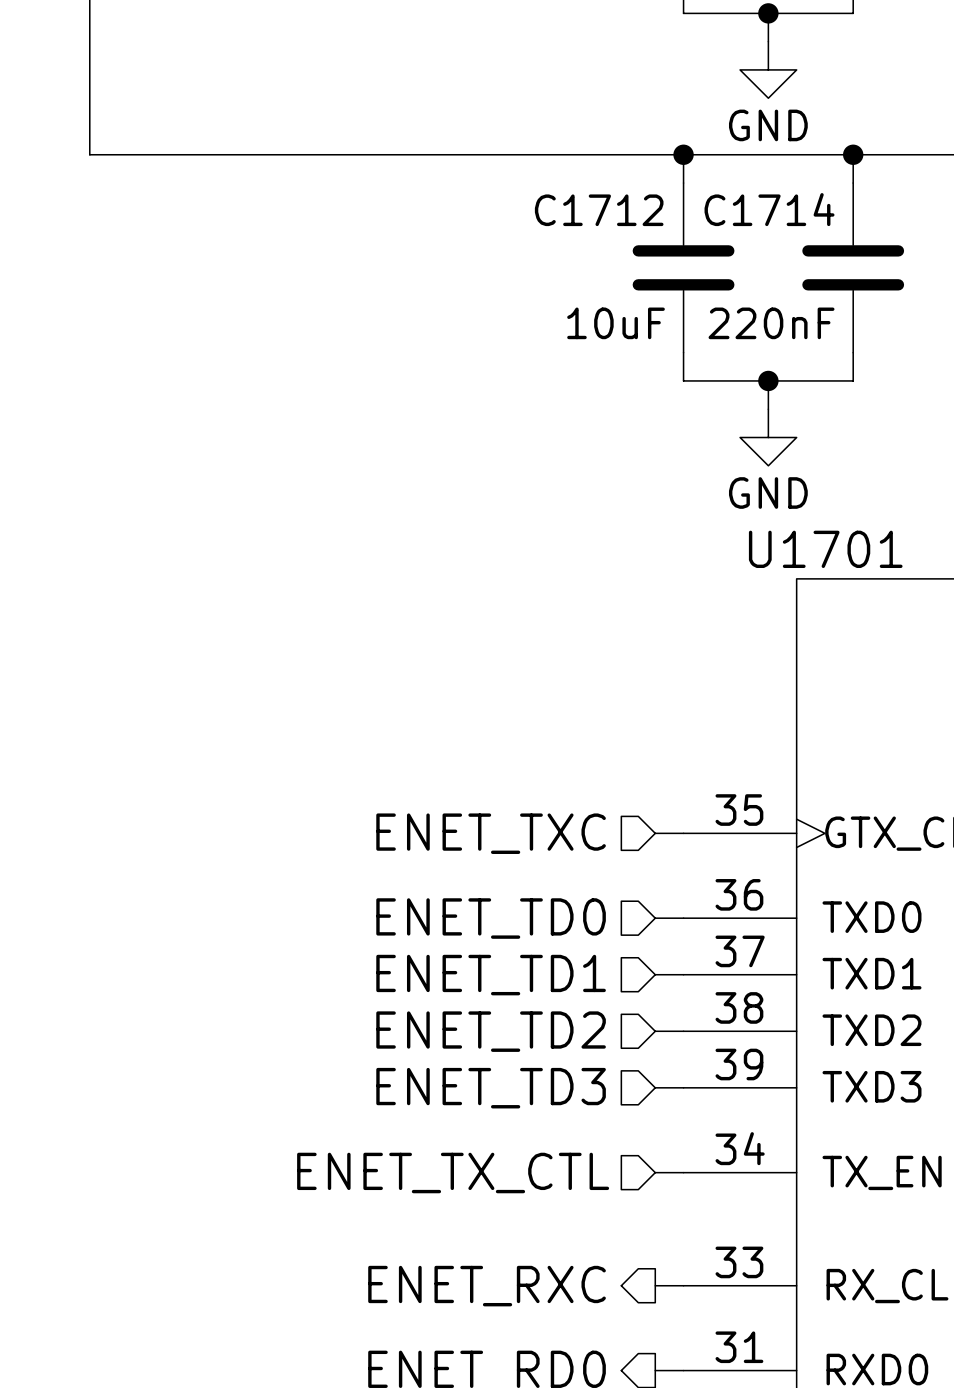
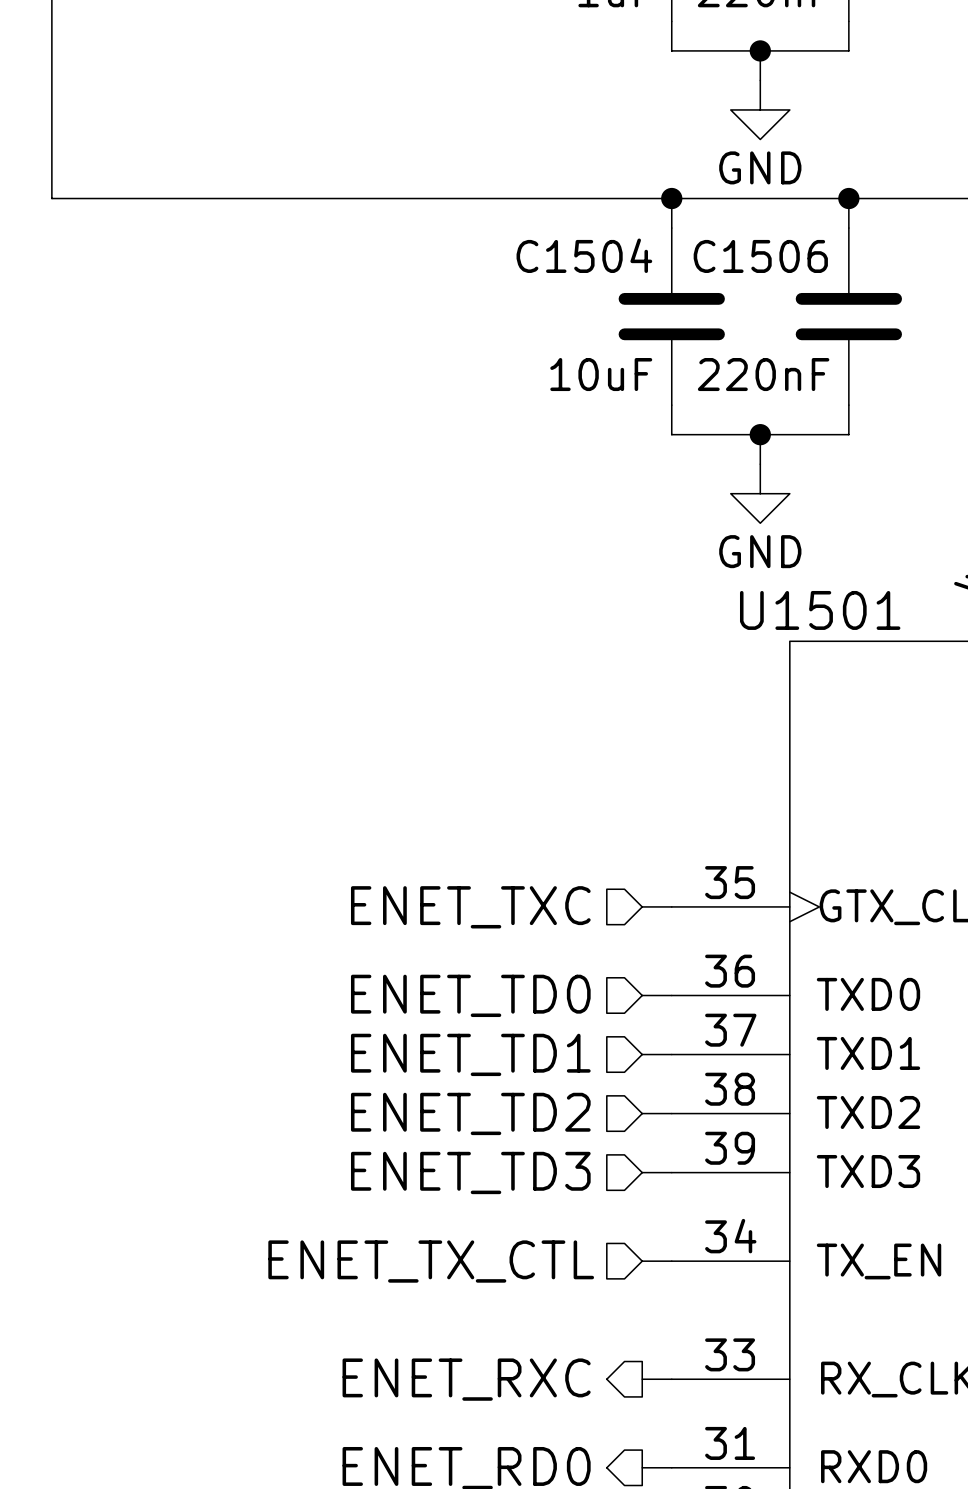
C1714 name: C1714 (769, 209) -> C1506 (760, 256)
C1712 name: C1712 (599, 210) -> C1504 (584, 255)
U1701 name: U1701 (825, 549) -> U1501 (820, 610)

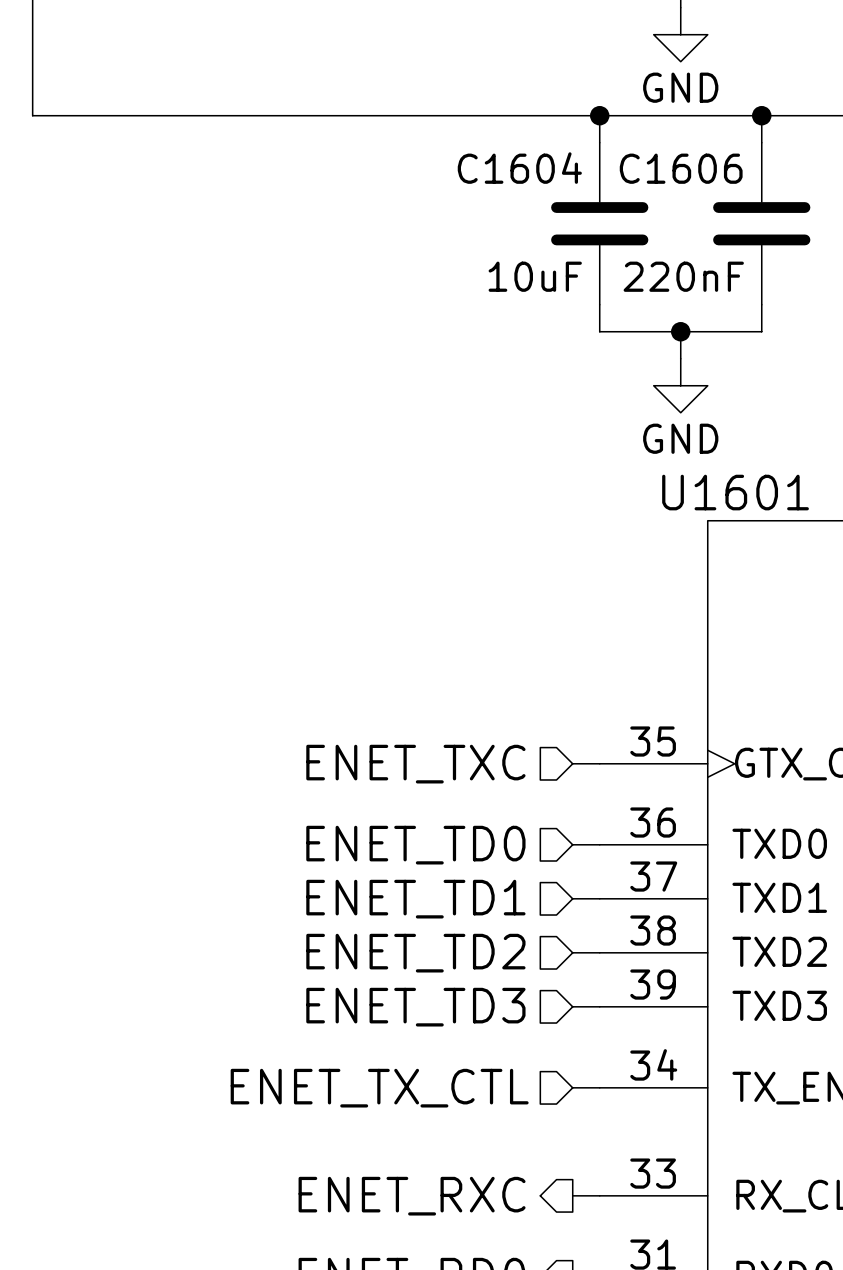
C1504 name: C1504 (584, 255) -> C1604 (519, 168)
C1506 name: C1506 (760, 256) -> C1606 (681, 168)
U1501 name: U1501 (820, 610) -> U1601 (735, 492)

